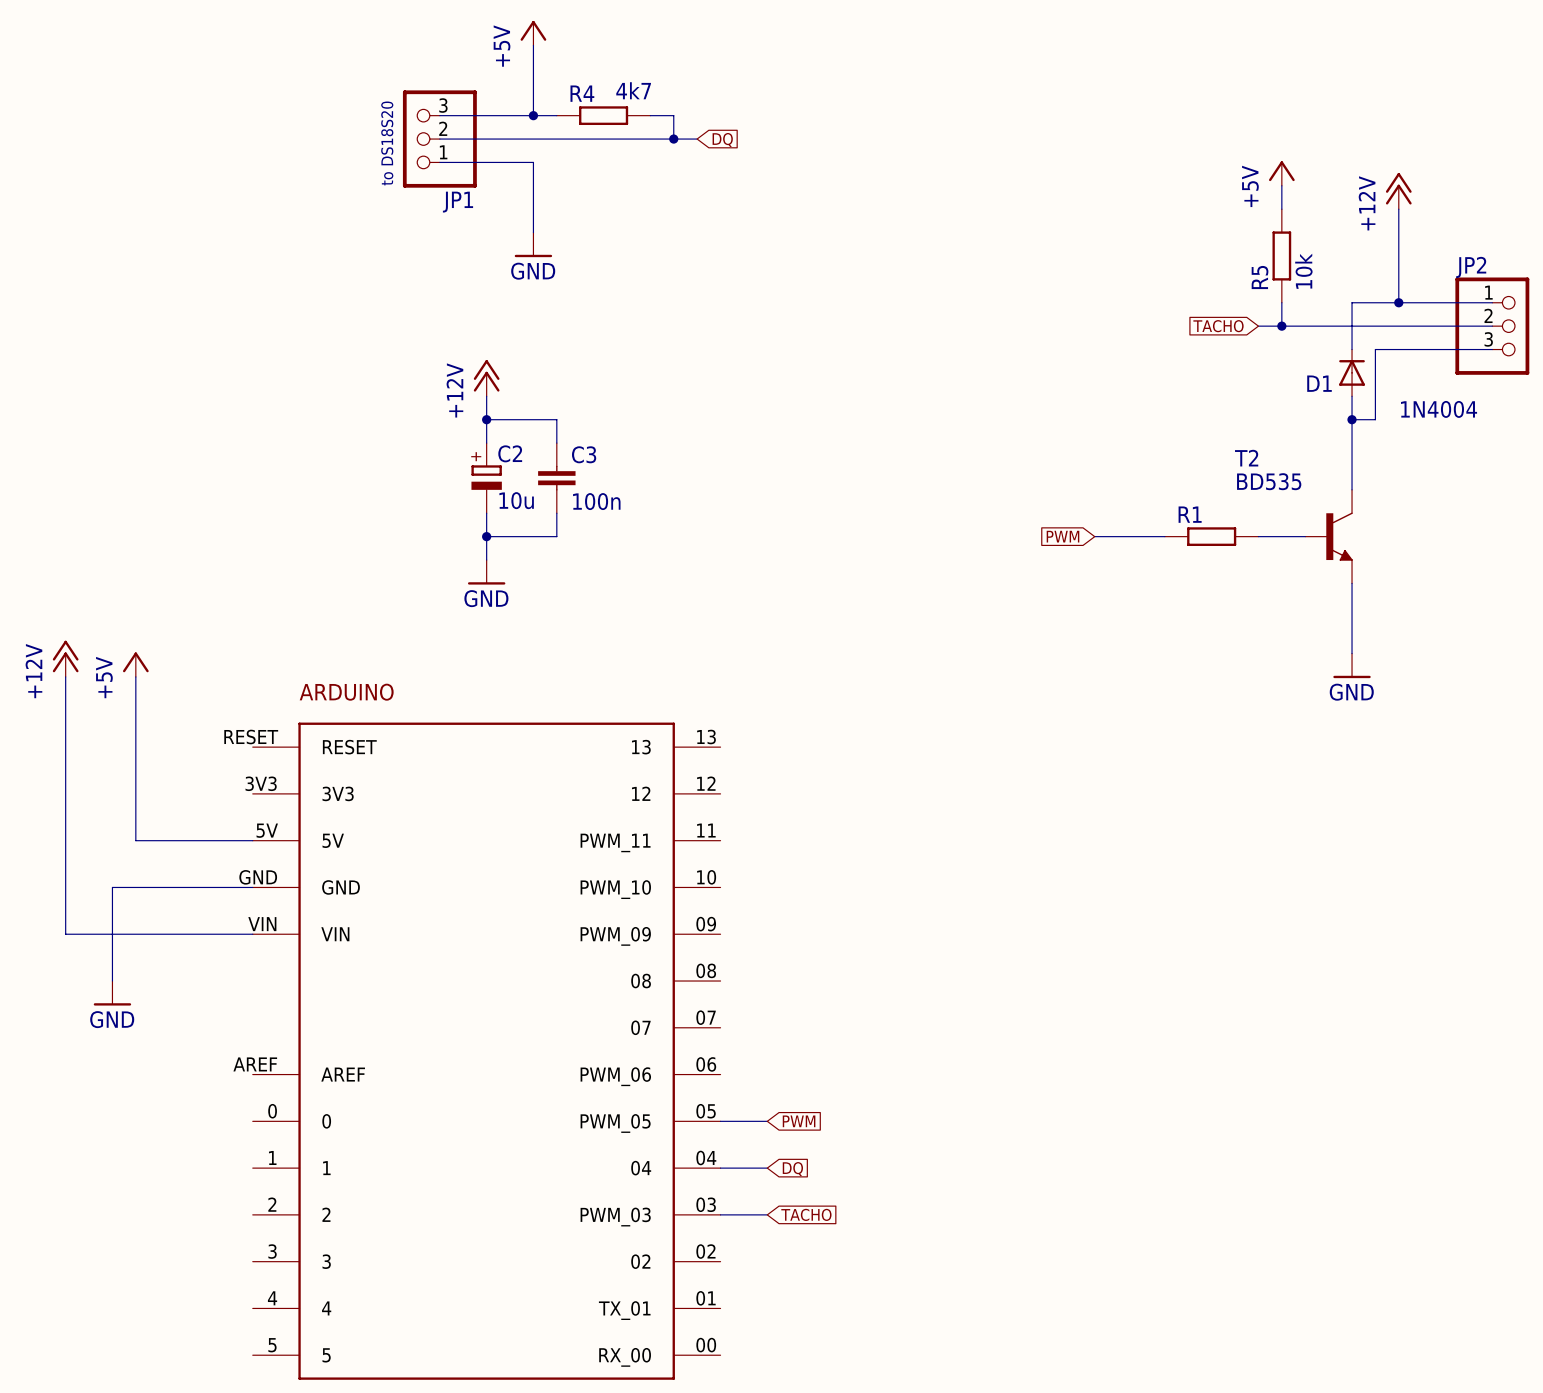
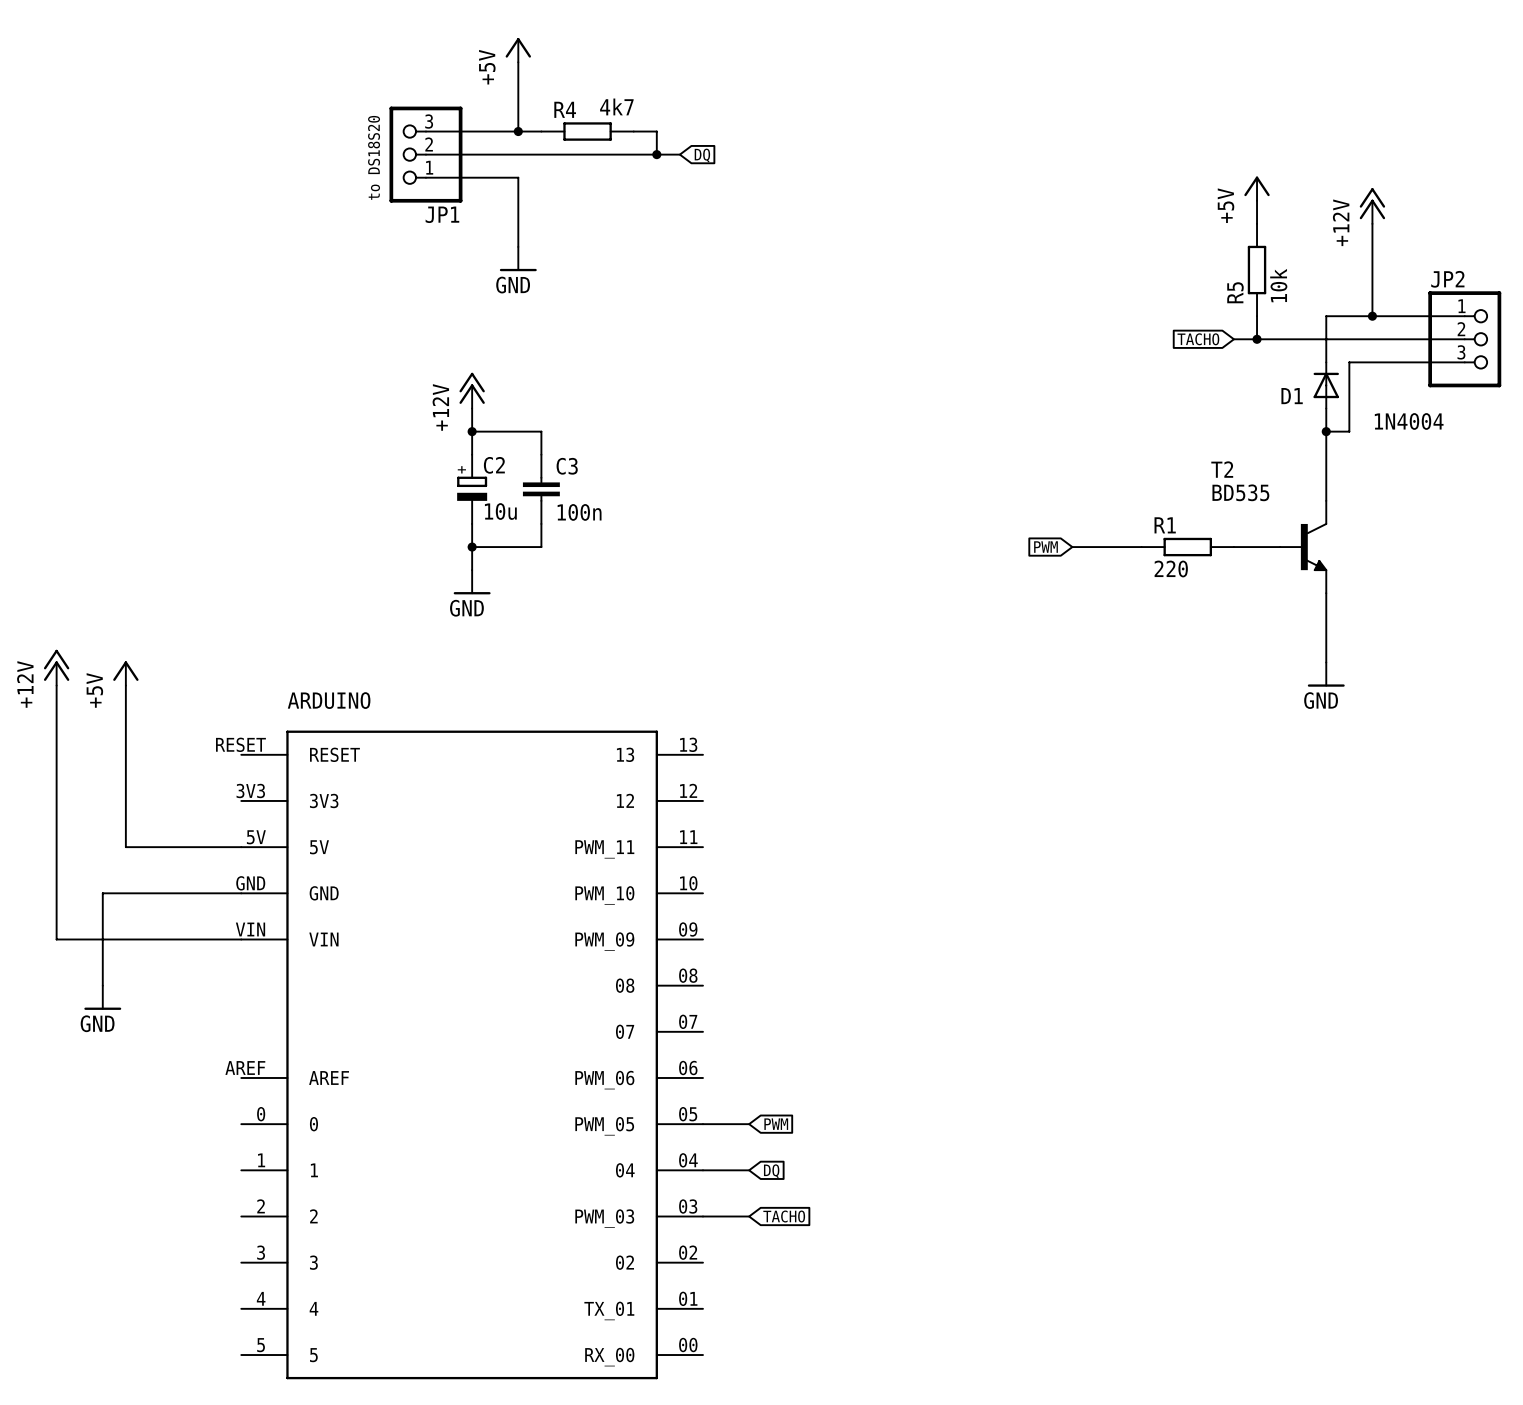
R1 value: none -> 220 (1171, 568)

